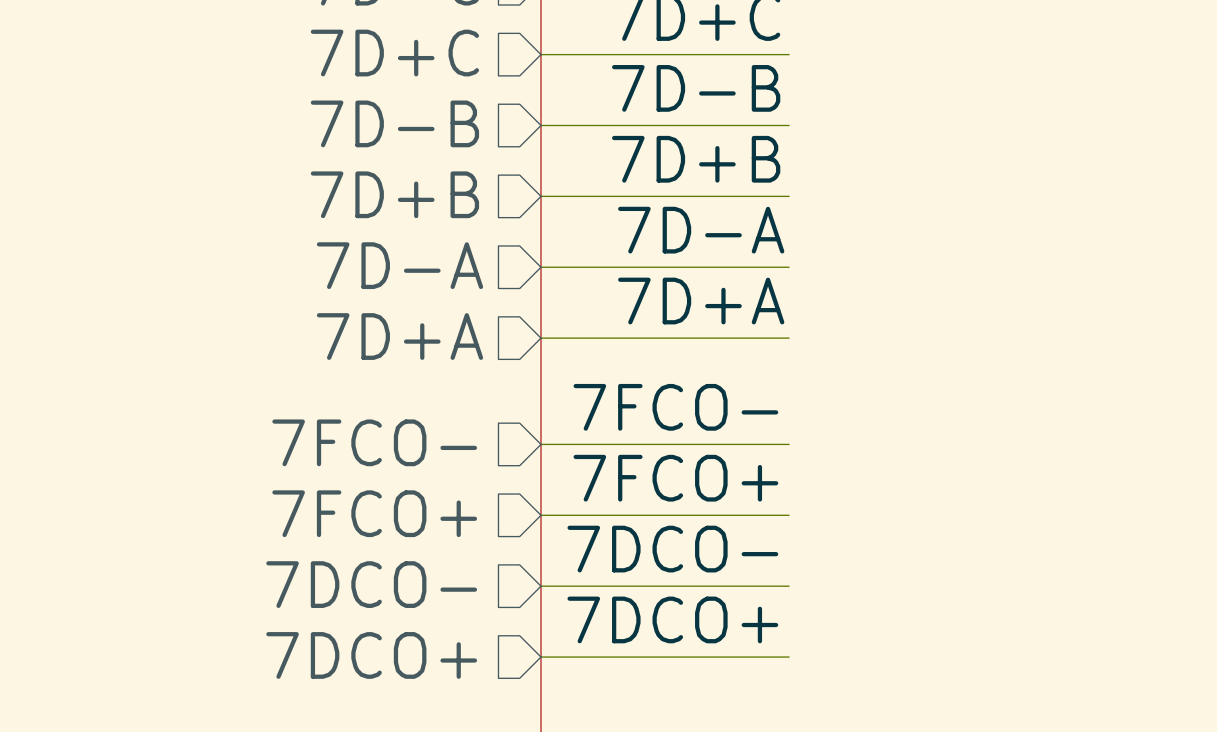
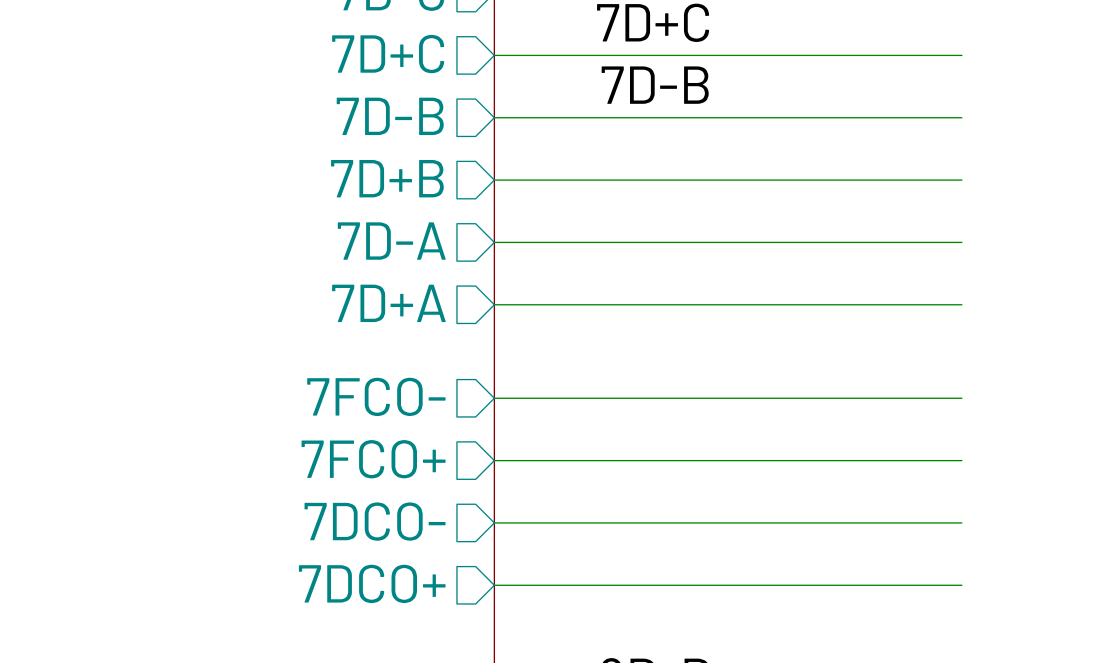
wire: none -> (712, 55) (961, 55)
wire: none -> (712, 117) (961, 117)
label: 7D+B (696, 159) -> none
wire: none -> (712, 180) (961, 180)
label: 7D-A (701, 230) -> none
wire: none -> (712, 242) (961, 242)
label: 7D+A (701, 301) -> none
wire: none -> (712, 304) (961, 304)
label: 7FCO- (675, 407) -> none
wire: none -> (712, 398) (961, 398)
label: 7FCO+ (675, 478) -> none
wire: none -> (712, 460) (961, 460)
label: 7DCO- (672, 549) -> none
wire: none -> (712, 522) (961, 522)
label: 7DCO+ (672, 619) -> none
wire: none -> (712, 585) (961, 585)

